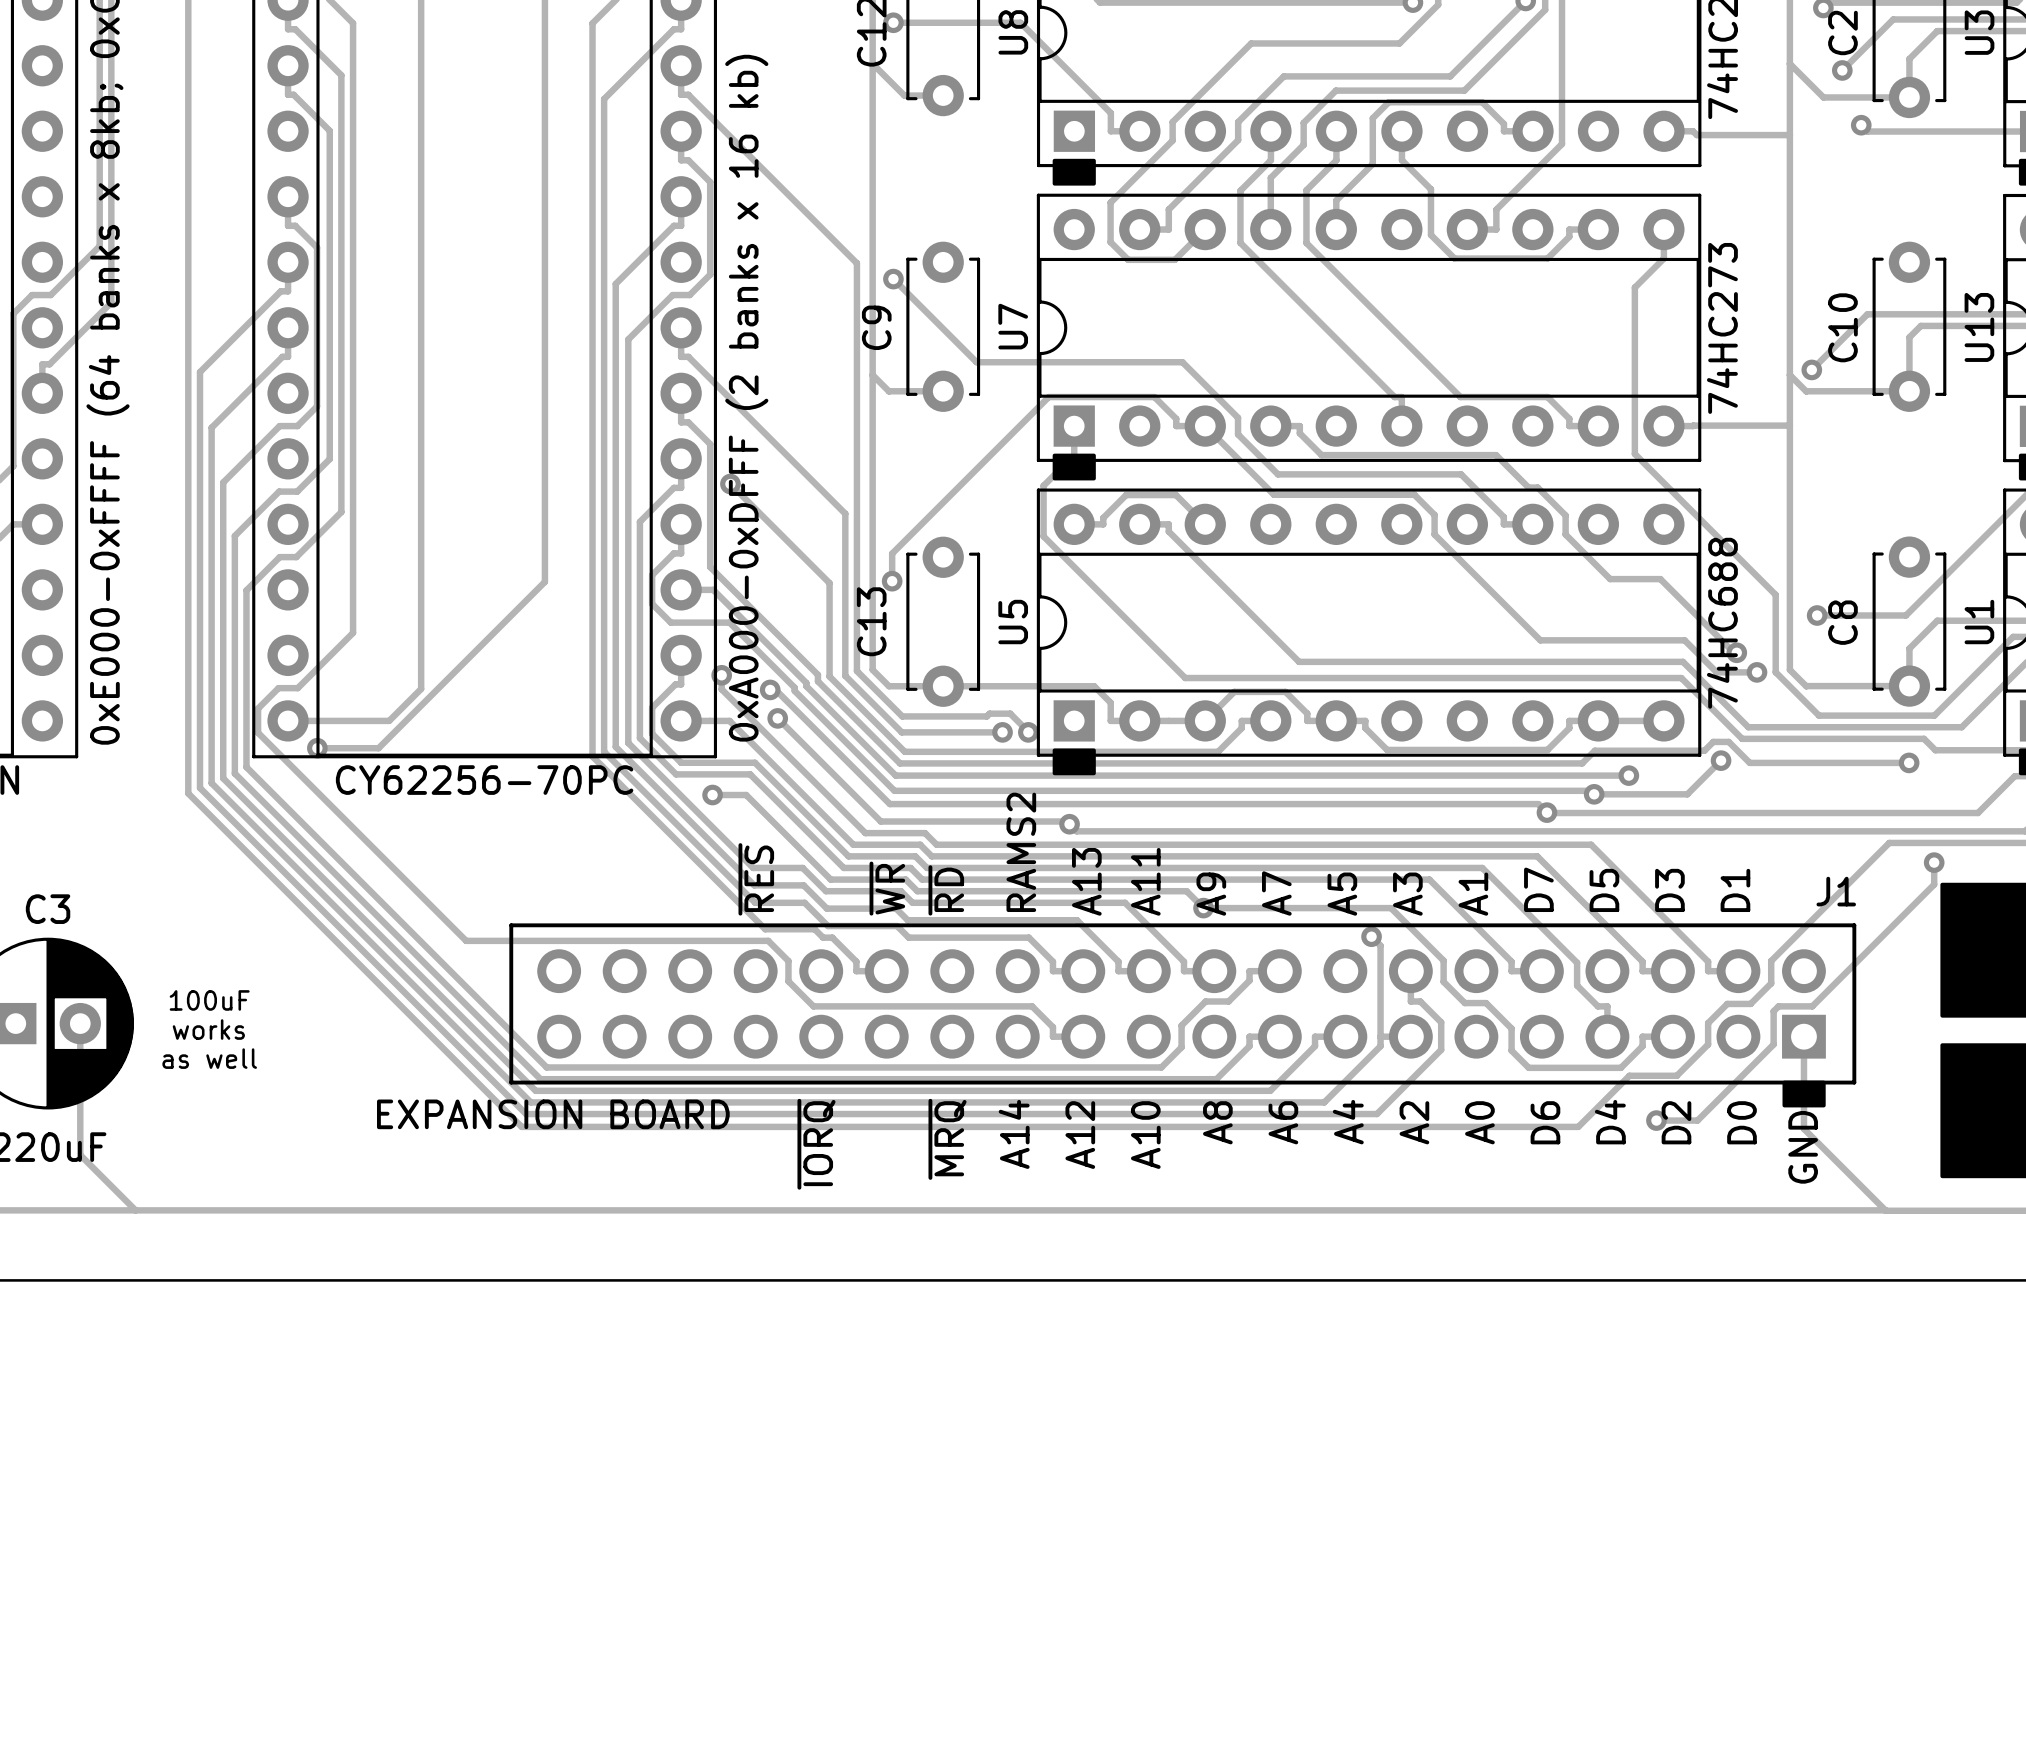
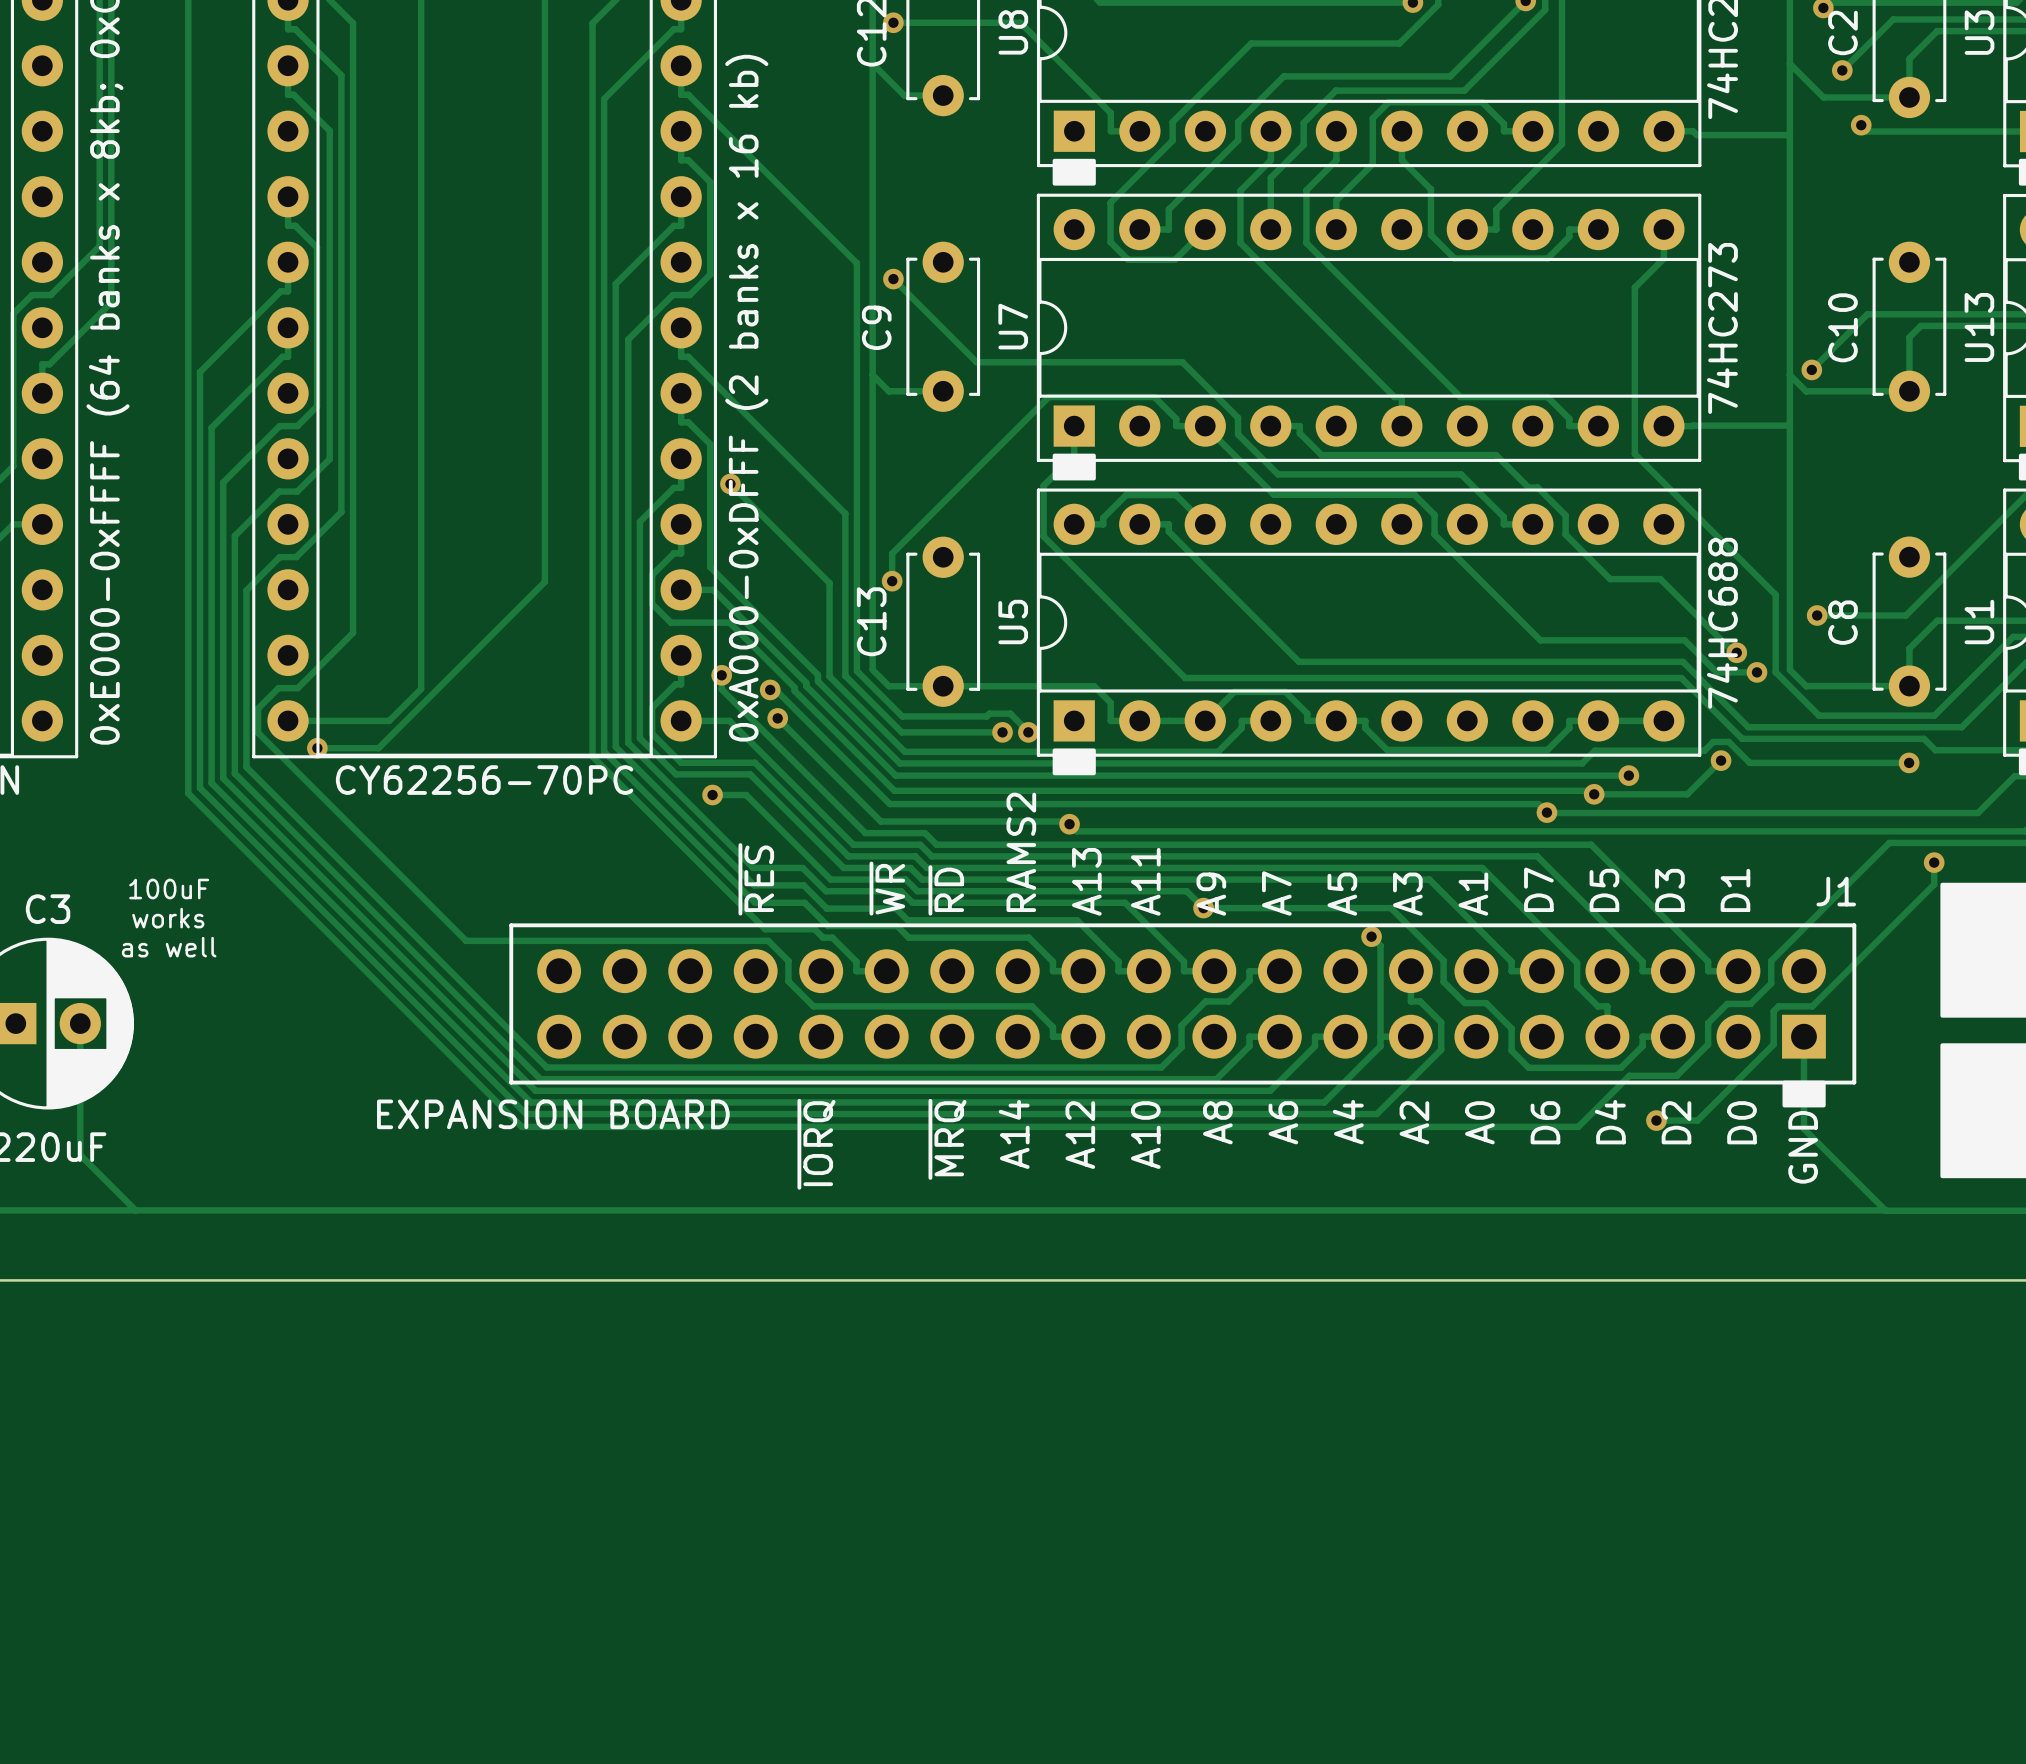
text position: 100uF (209, 1000) -> 100uF (169, 889)
text position: works (208, 1029) -> works (168, 918)
text position: as well (209, 1058) -> as well (169, 947)

